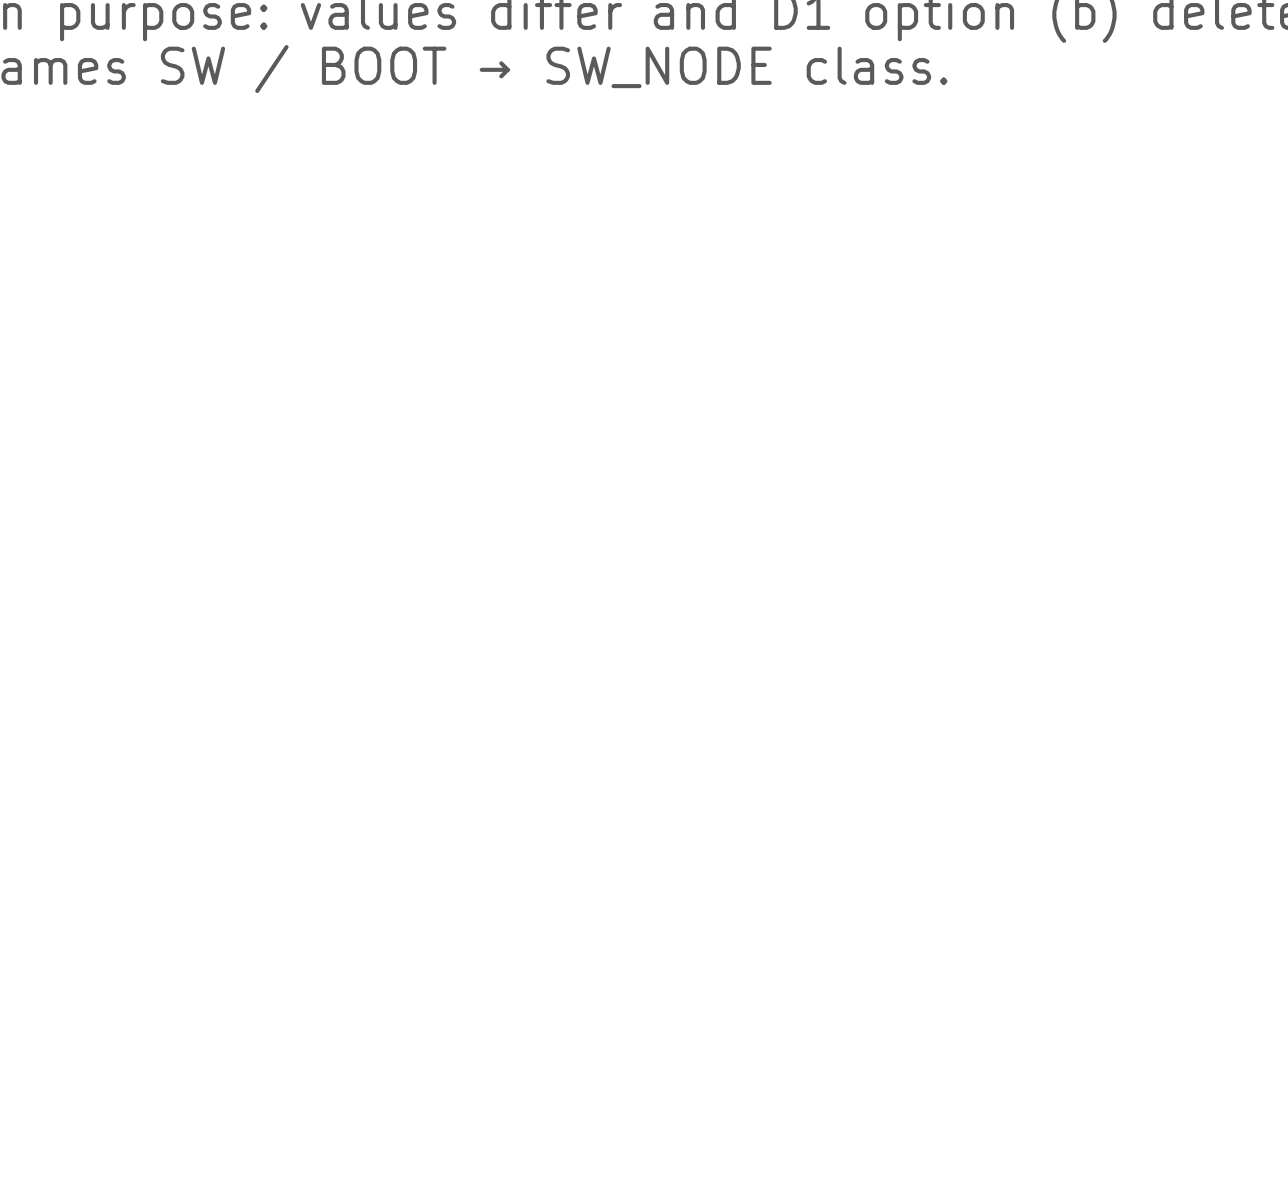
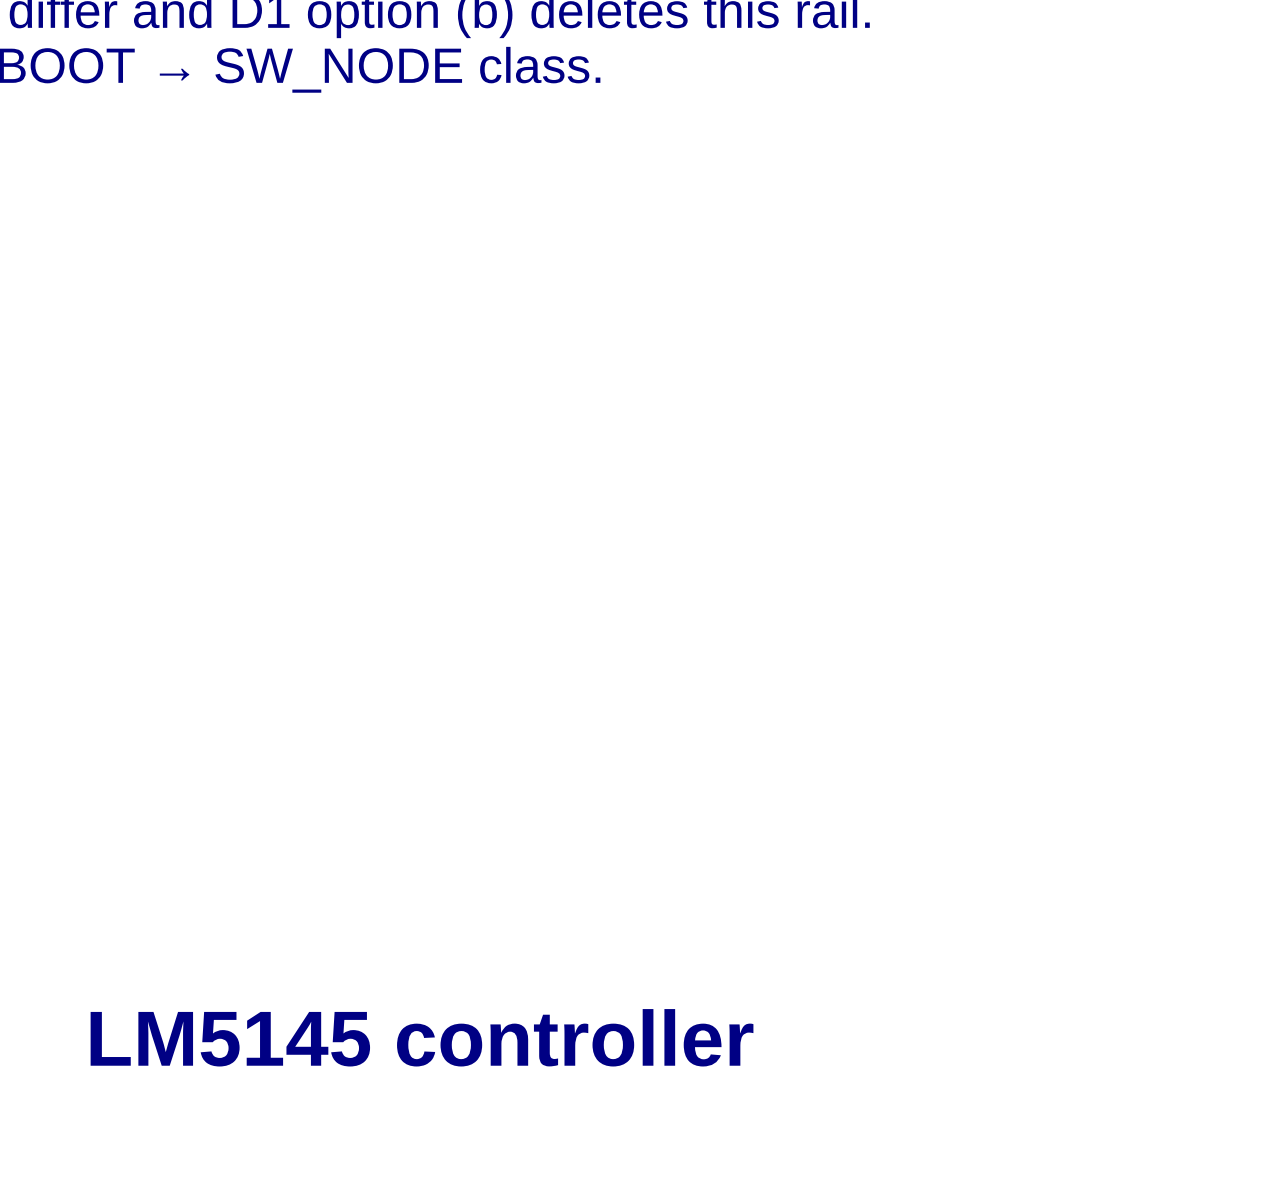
text: none -> LM5145 controller (422, 1037)

